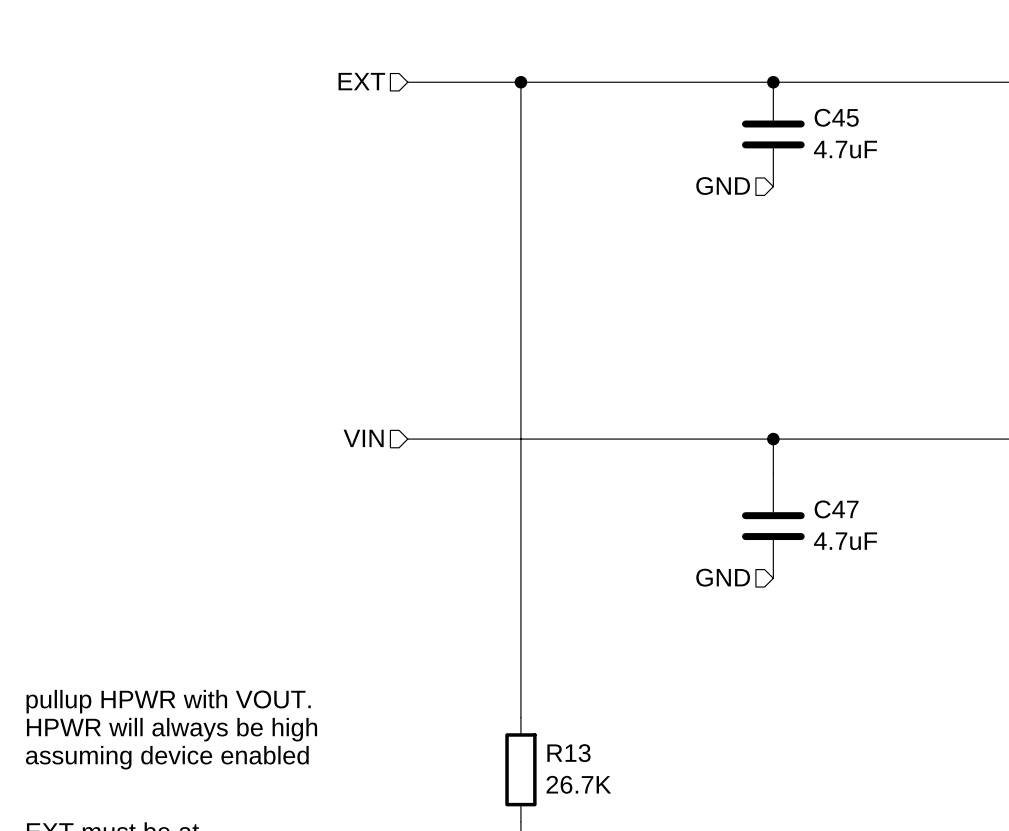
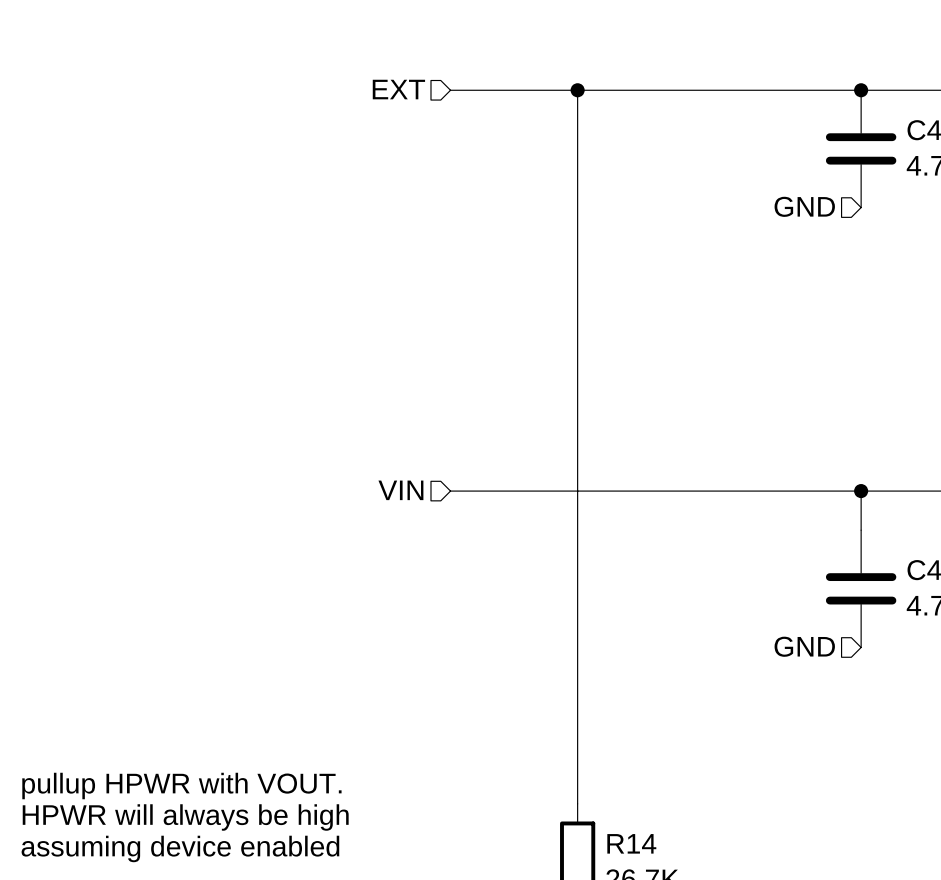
R13 name: R13 (569, 753) -> R14 (631, 843)

